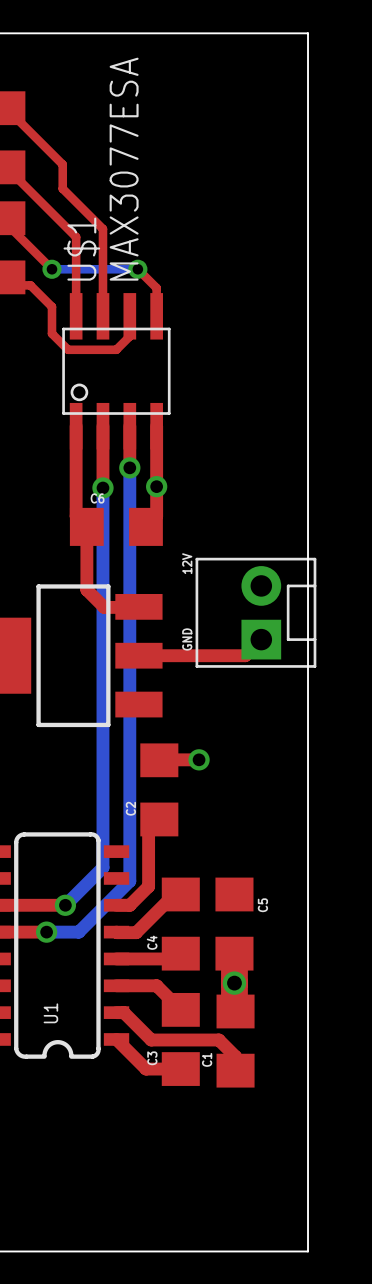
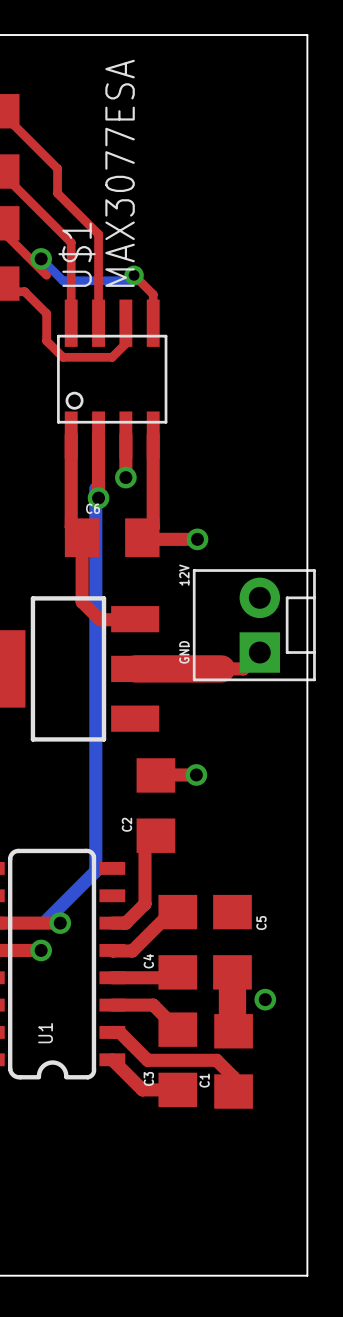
bottom track: none -> (41, 258) (63, 280) (139, 280)
bottom track: (51, 269) (137, 269) -> none
via position: (51, 269) -> (41, 258)
bottom track: (129, 467) (129, 881) (78, 932) (46, 932) -> none
bottom track: none -> (95, 488) (95, 871) (46, 920)
via position: (156, 486) -> (197, 539)
bottom track: (102, 487) (102, 867) (65, 905) -> none
top track: none -> (142, 537) (143, 539) (197, 539)
top track width: thin (138, 655) (223, 655) -> thick (135, 668) (221, 668)
via: none -> (265, 999)
via: (234, 983) -> none

